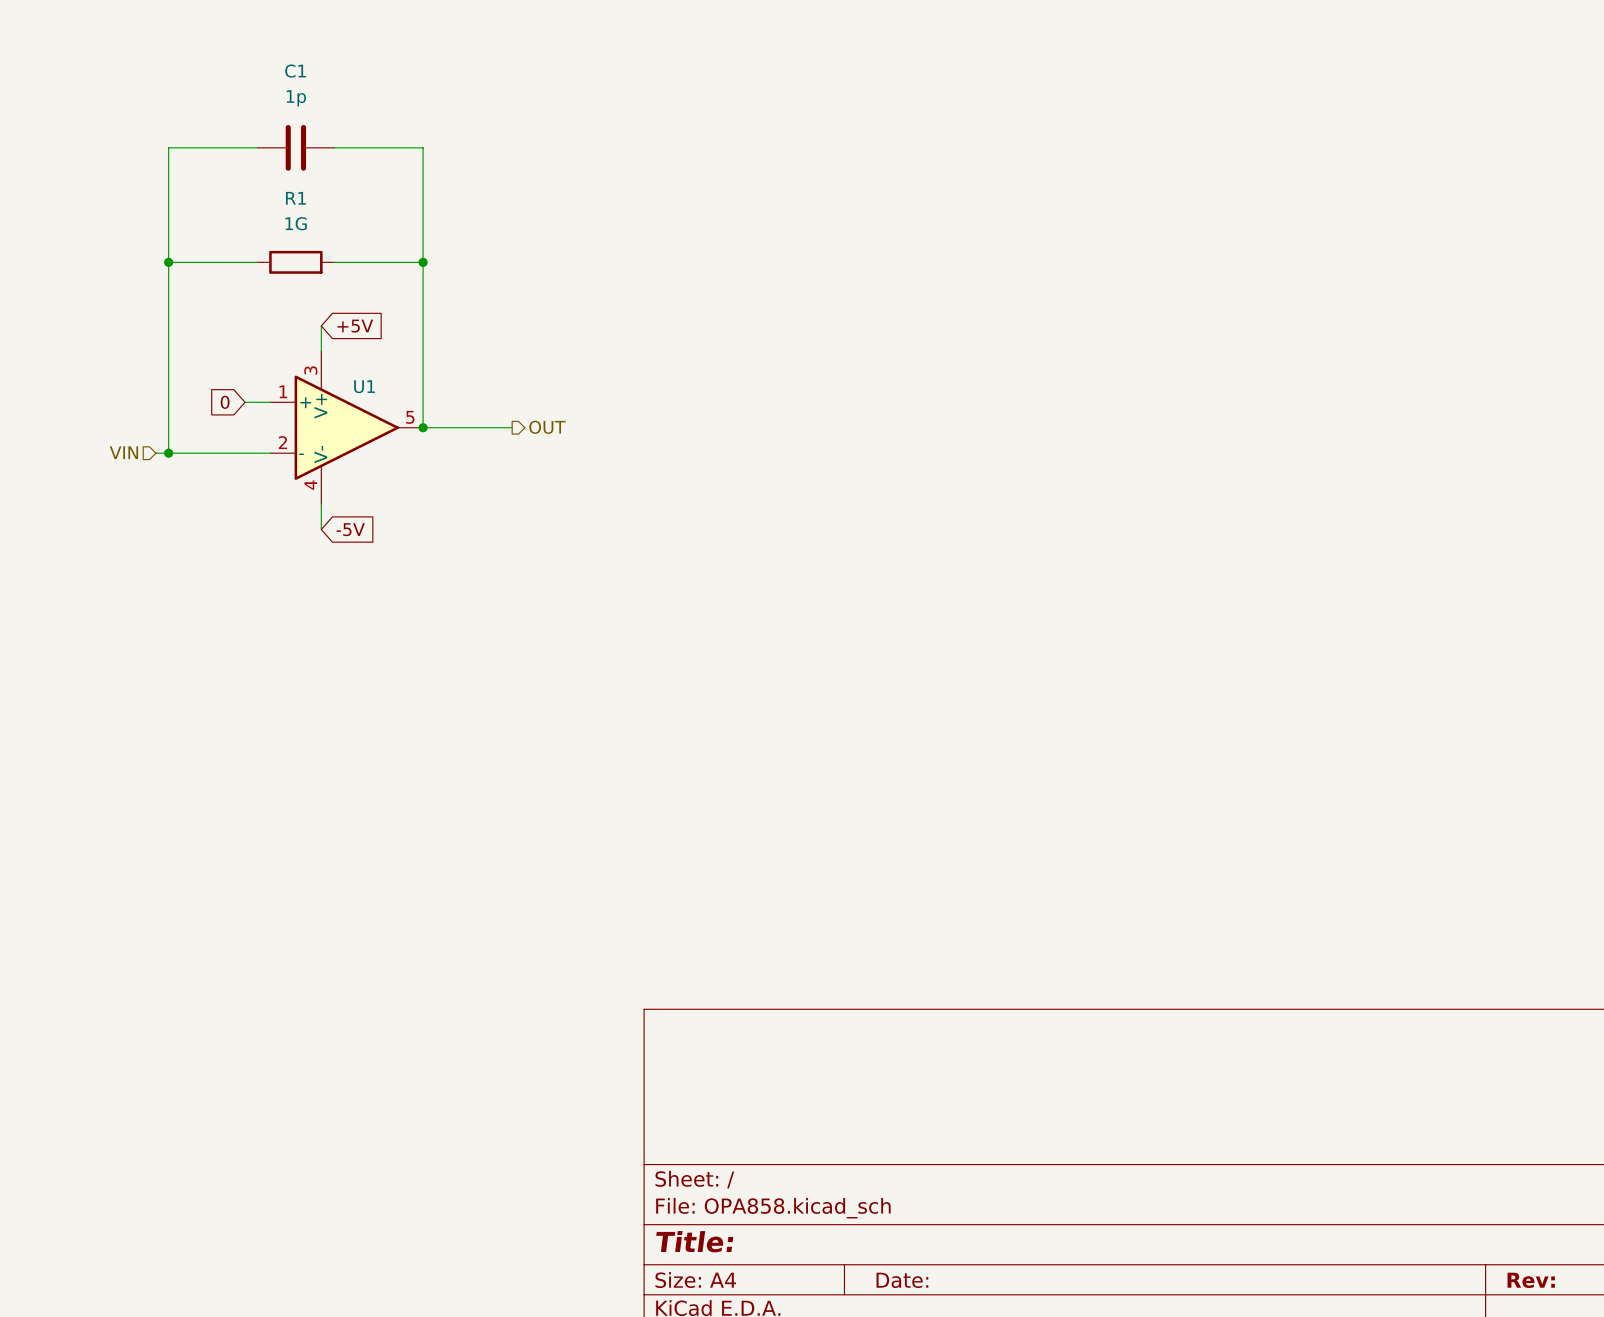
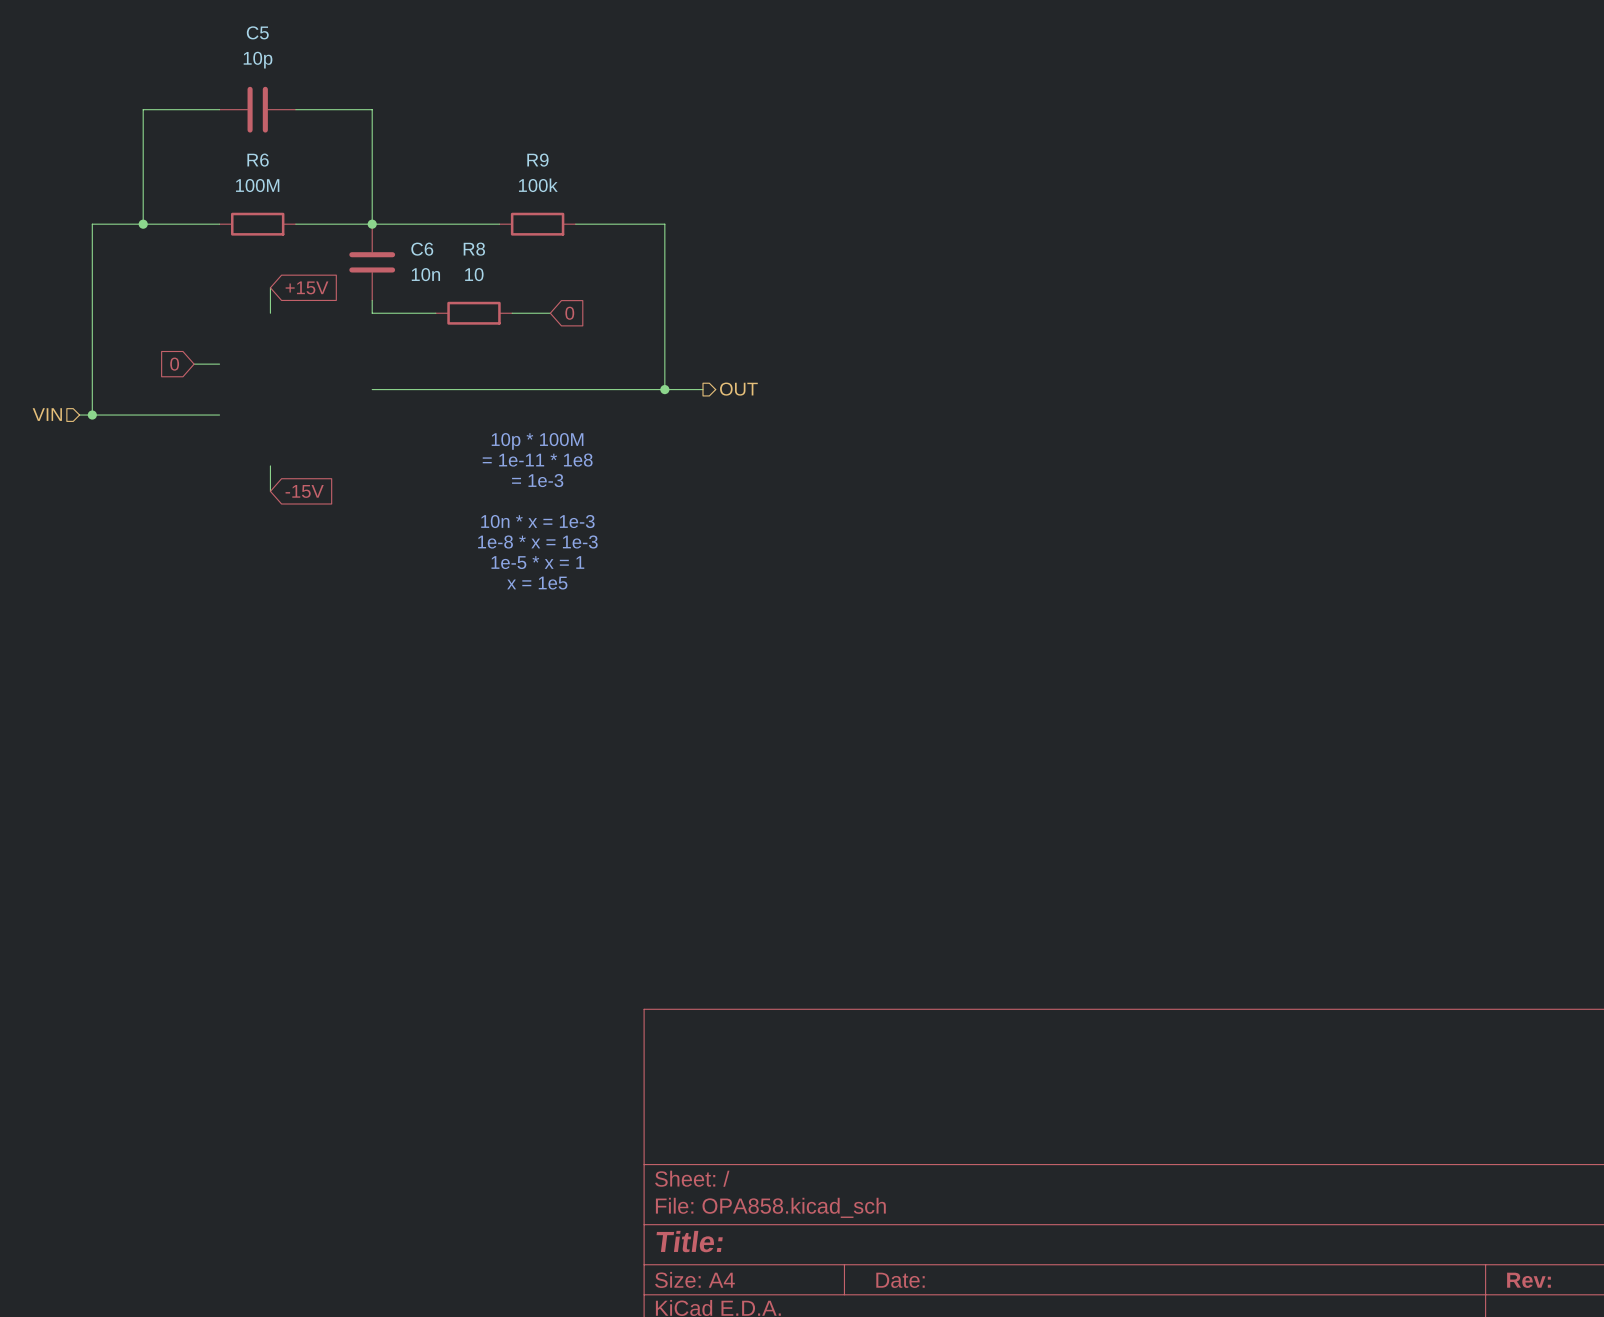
wire: none -> (219, 109) (143, 109) (143, 224)
C5: none -> 10p (257, 109)
wire: none -> (295, 109) (372, 109) (372, 224)
wire: (257, 147) (168, 147) (168, 453) -> none
C1: 1p (295, 147) -> none
wire: (334, 147) (423, 147) (423, 427) (512, 427) -> none
wire: none -> (219, 224) (92, 224) (92, 415)
R6: none -> 100M (257, 224)
wire: none -> (295, 224) (499, 224)
junction: none -> (372, 224)
R9: none -> 100k (537, 224)
wire: none -> (575, 224) (664, 224) (664, 389)
wire: (168, 262) (257, 262) -> none
junction position: (168, 262) -> (143, 224)
R1: 1G (295, 262) -> none
wire: (334, 262) (423, 262) -> none
C6: none -> 10n (372, 262)
junction: (423, 262) -> none
global label: none -> +15V (307, 287)
wire: none -> (372, 300) (372, 313) (435, 313)
R8: none -> 10 (473, 313)
wire: none -> (512, 313) (550, 313)
global label: none -> 0 (569, 313)
wire: (321, 325) (321, 351) -> (270, 287) (270, 313)
global label: +5V (355, 326) -> none
wire: none -> (372, 389) (703, 389)
junction: none -> (664, 389)
global label position: 0 (225, 402) -> 0 (174, 364)
wire: (244, 402) (270, 402) -> (194, 364) (219, 364)
wire: none -> (79, 415) (219, 415)
junction: none -> (92, 415)
U1: (346, 427) -> none
junction: (423, 427) -> none
hierarchical label position: OUT (547, 427) -> OUT (738, 389)
text: none -> 10p * 100M (537, 441)
hierarchical label position: VIN (123, 452) -> VIN (47, 414)
wire: (155, 453) (270, 453) -> none
junction: (168, 453) -> none
text: none -> = 1e-11 * 1e8 (537, 460)
text: none -> = 1e-3 (537, 480)
global label: none -> -15V (304, 491)
wire: (321, 504) (321, 529) -> (270, 465) (270, 491)
text: none -> 10n * x = 1e-3 (537, 521)
global label: -5V (350, 529) -> none
text: none -> 1e-8 * x = 1e-3 (537, 542)
text: none -> 1e-5 * x = 1 (537, 562)
text: none -> x = 1e5 (537, 583)

